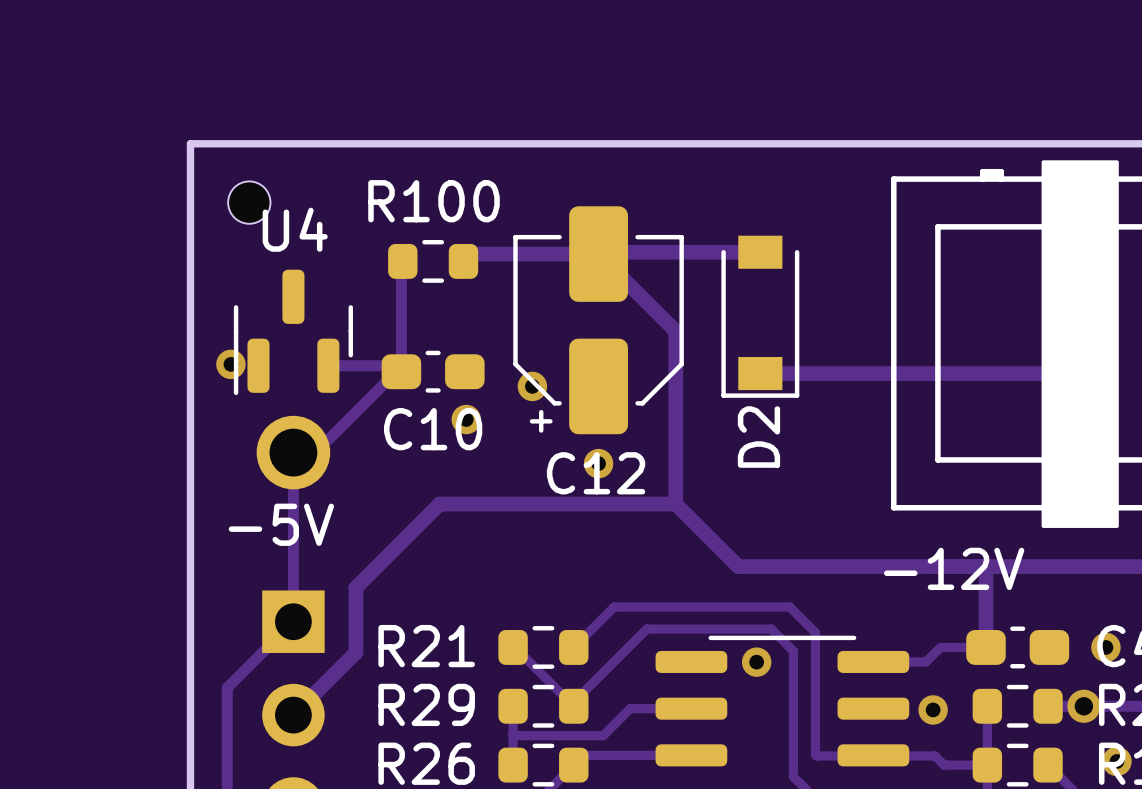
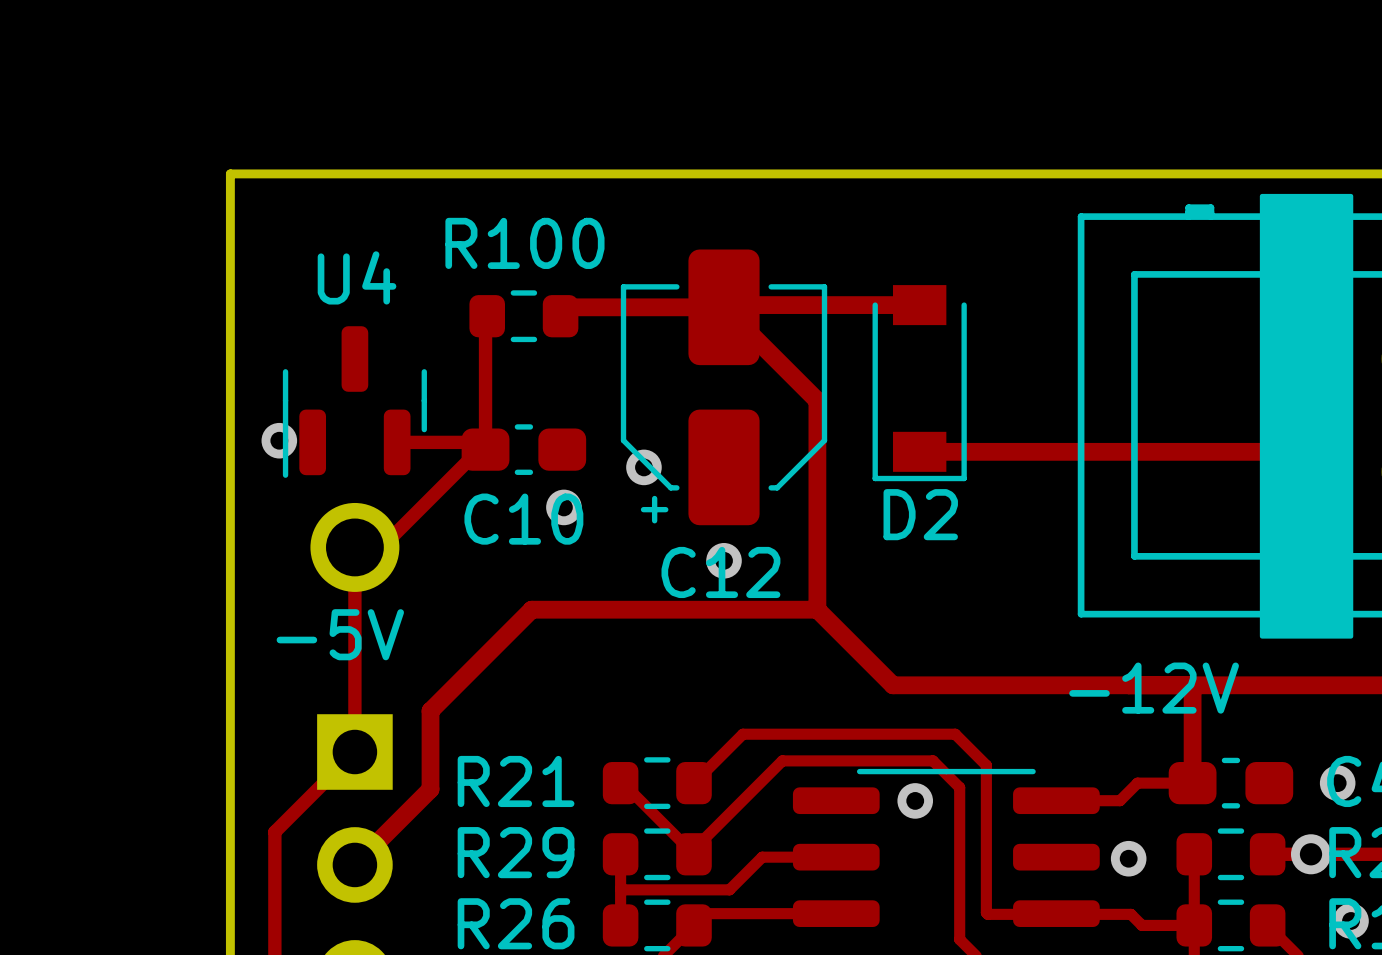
part: (249, 202) -> none
D2 name rotation: 0° (758, 437) -> 90° clockwise (920, 514)

